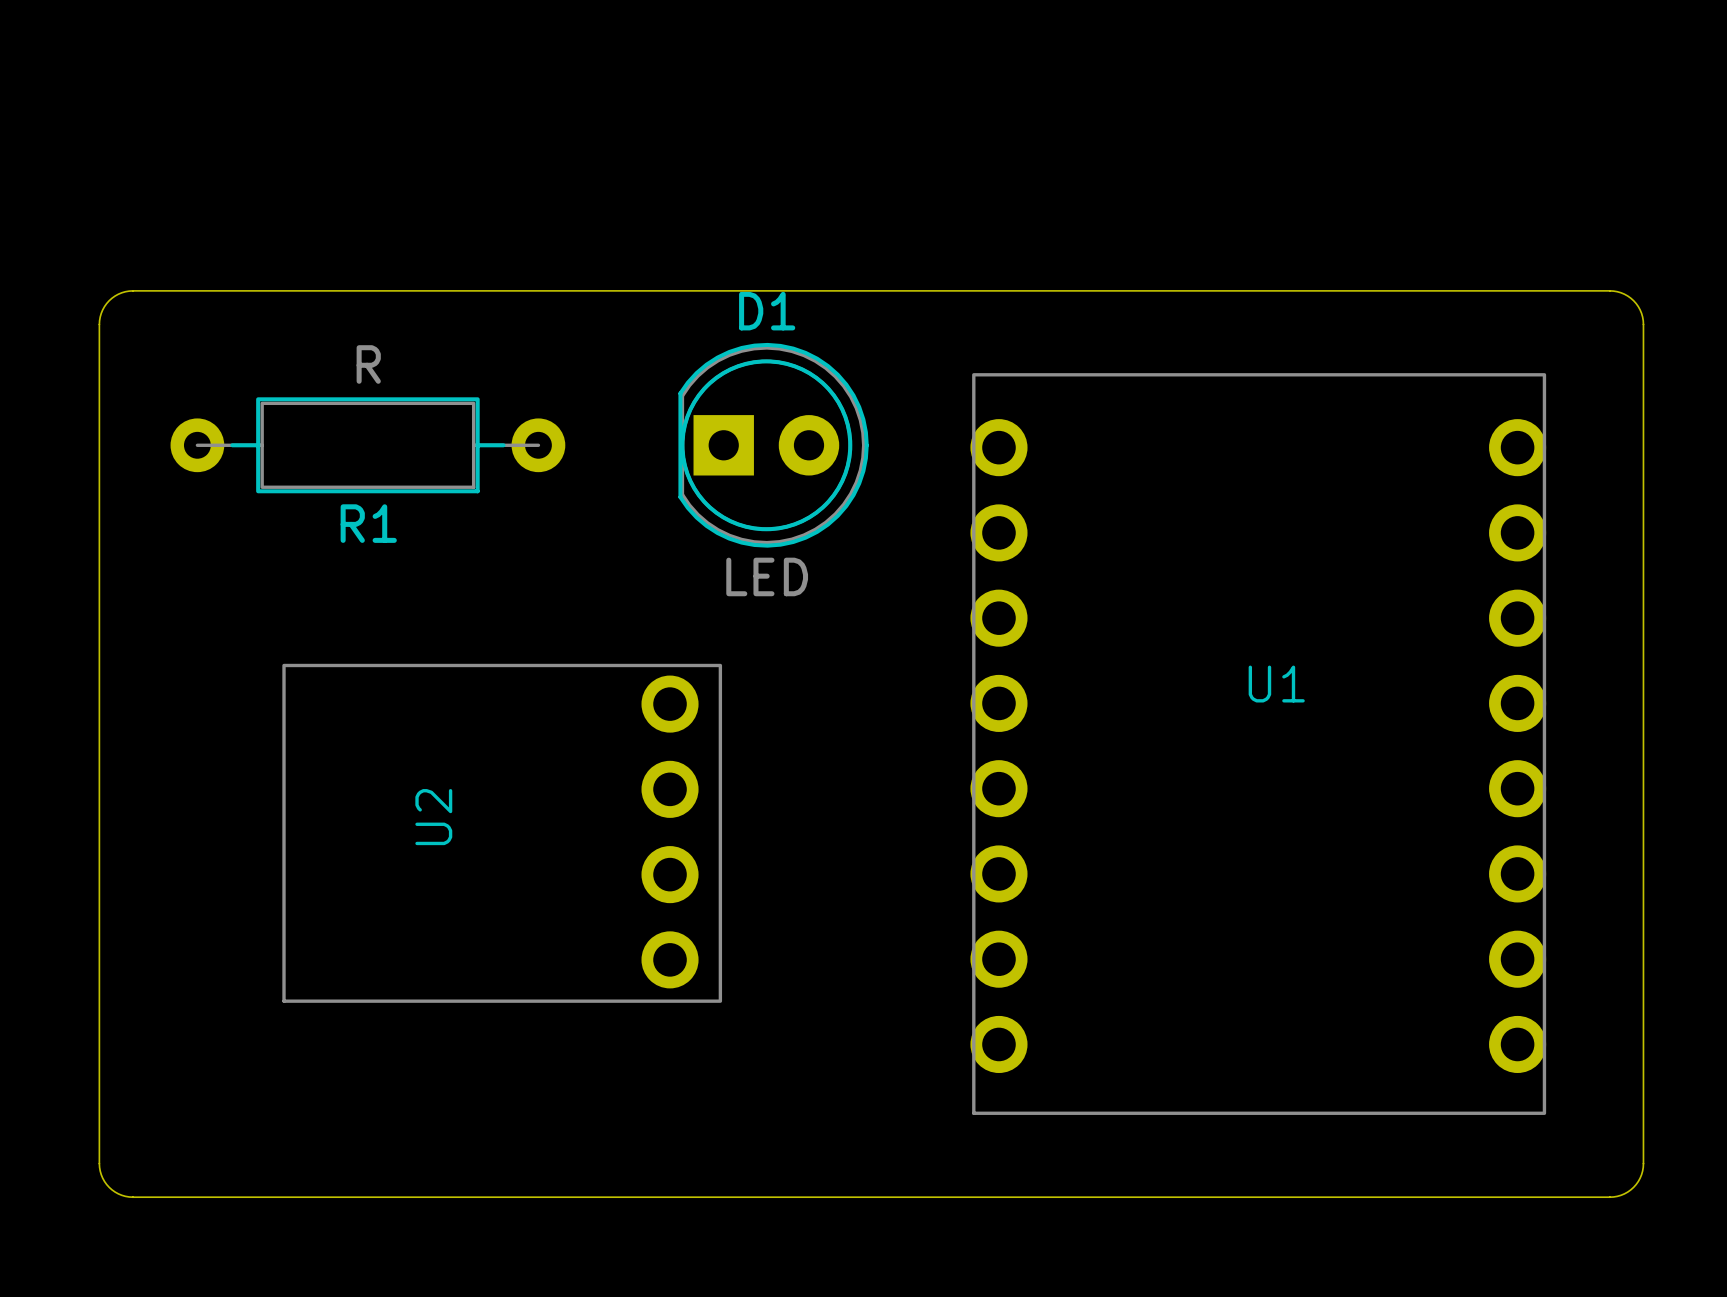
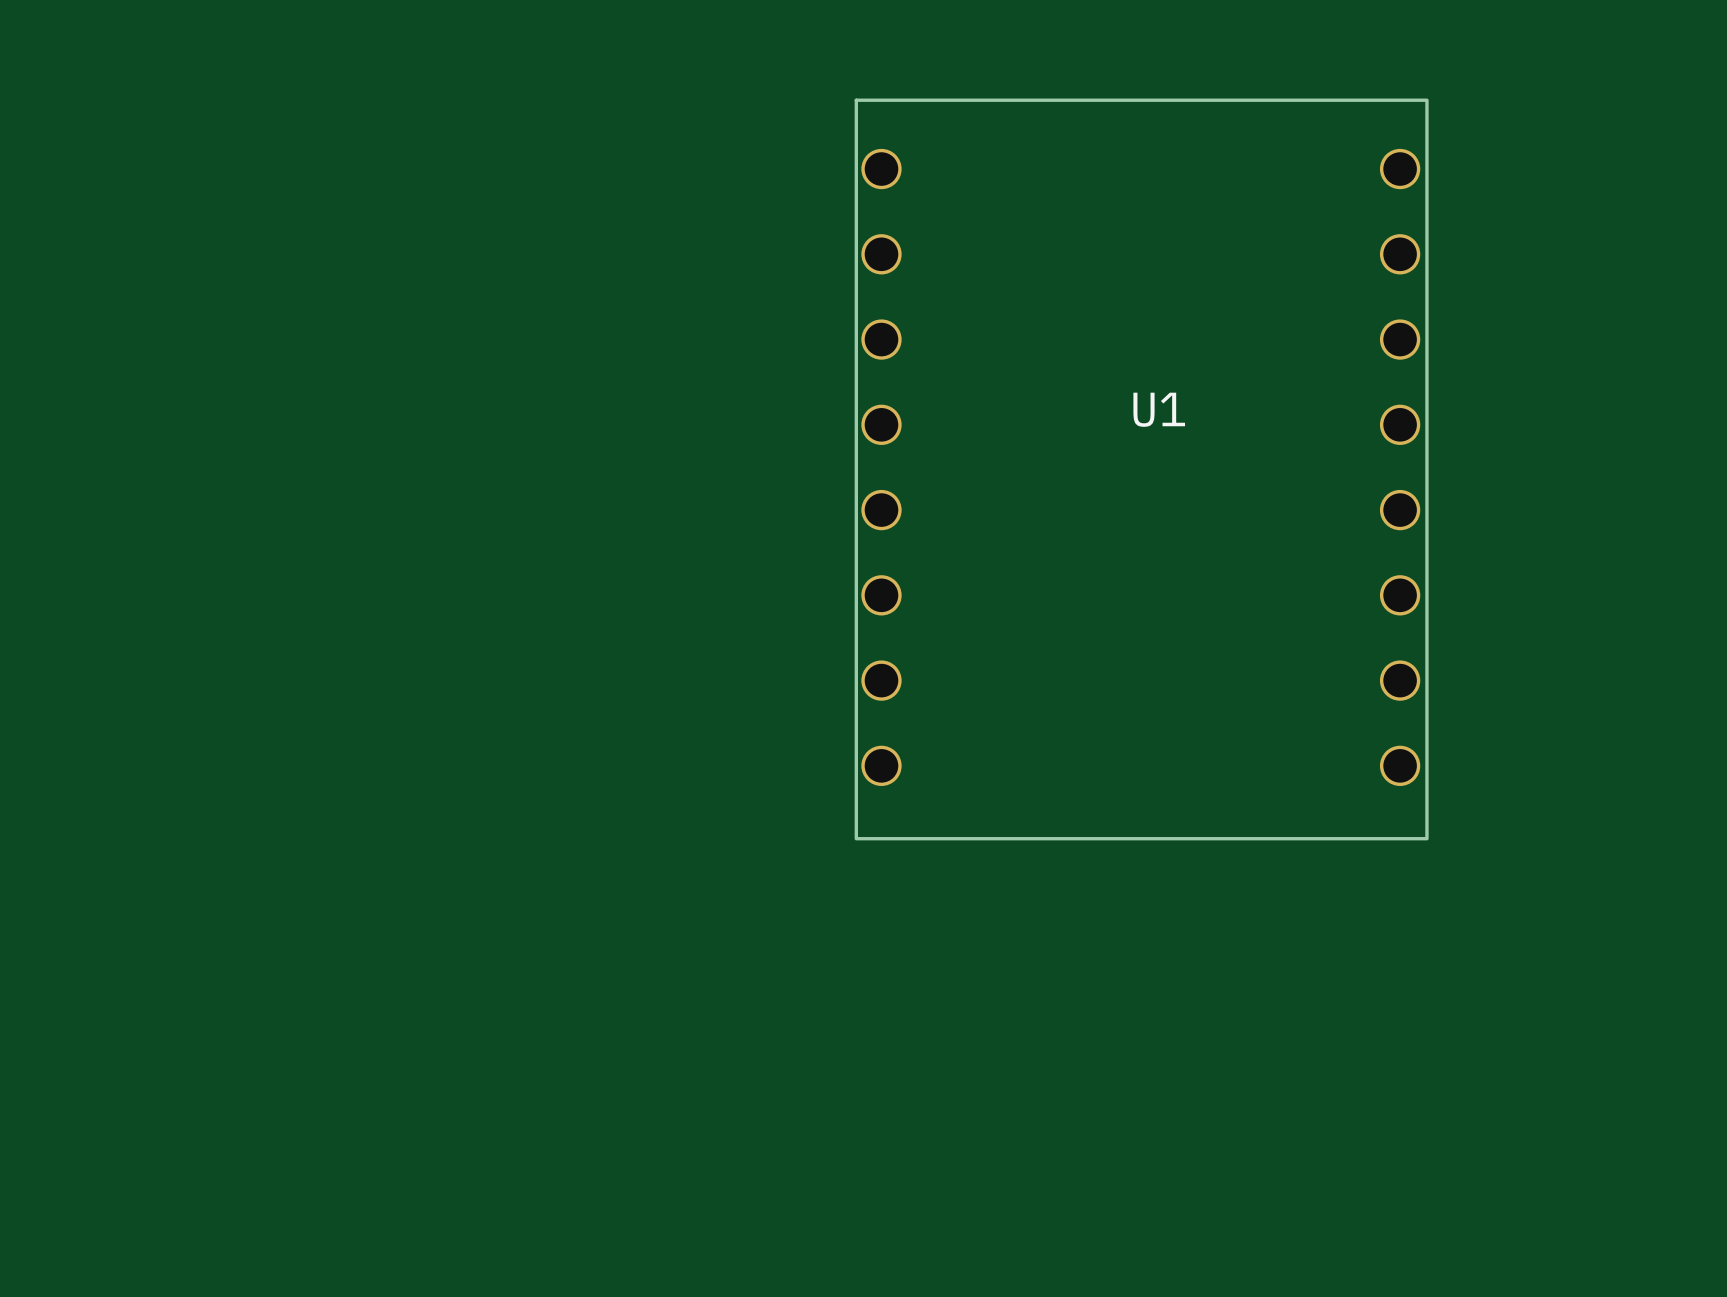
board edge: (132, 290) (1609, 290) (1627, 296) (1640, 309) (1643, 324) (1643, 1163) (1638, 1181) (1624, 1193) (1609, 1197) (132, 1197) (115, 1192) (102, 1178) (99, 1163) (99, 324) (101, 313) (109, 300) (118, 294) (132, 290) -> none
U1 footprint: [970, 373, 1547, 1115] -> [854, 98, 1429, 841]
R1: R (367, 445) -> none
D1: LED (773, 445) -> none
U2: (502, 833) -> none

